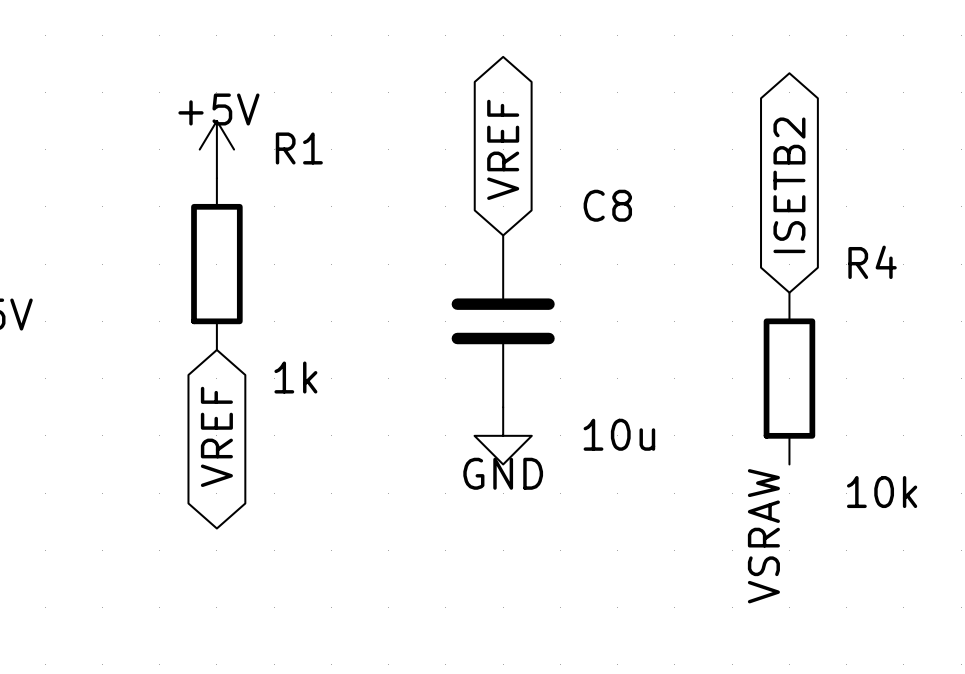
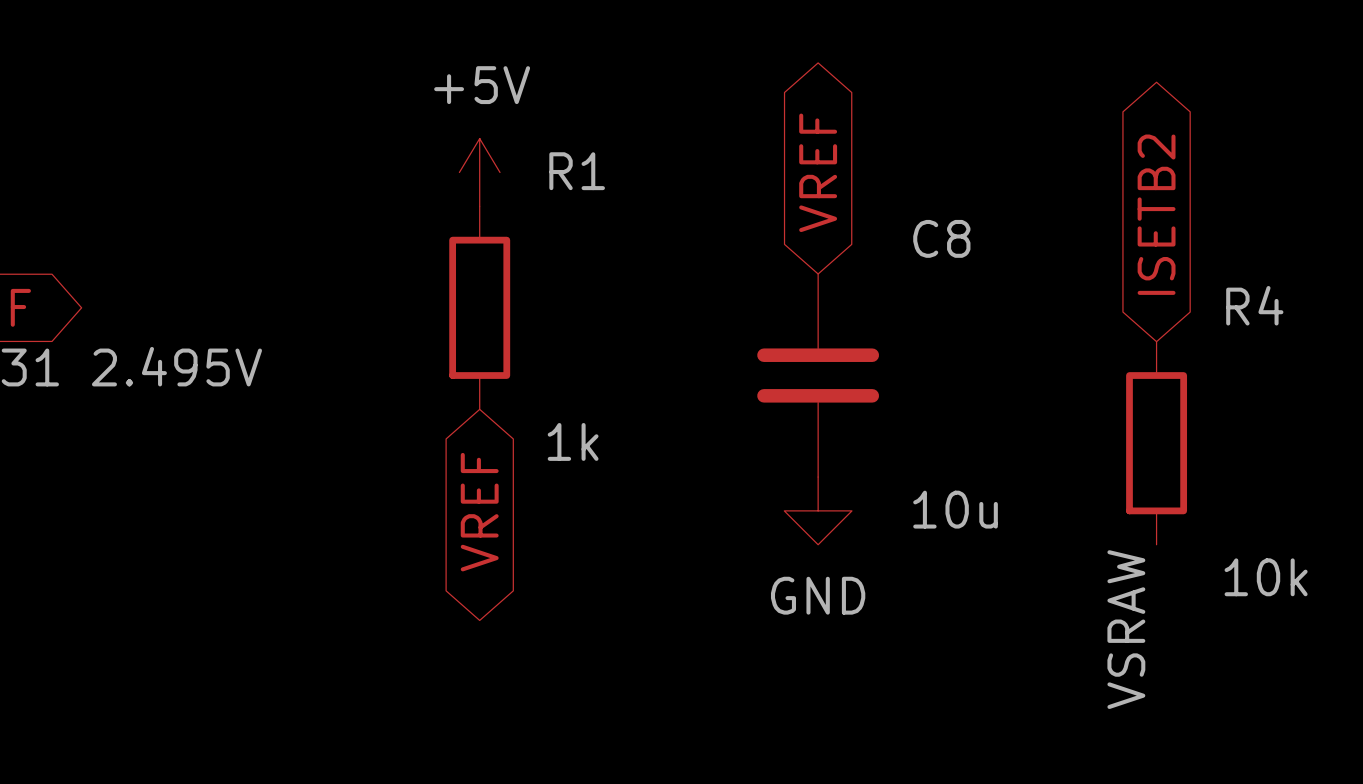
power symbol text position: +5V (218, 109) -> +5V (482, 85)
power symbol text position: GND (503, 473) -> GND (818, 595)

